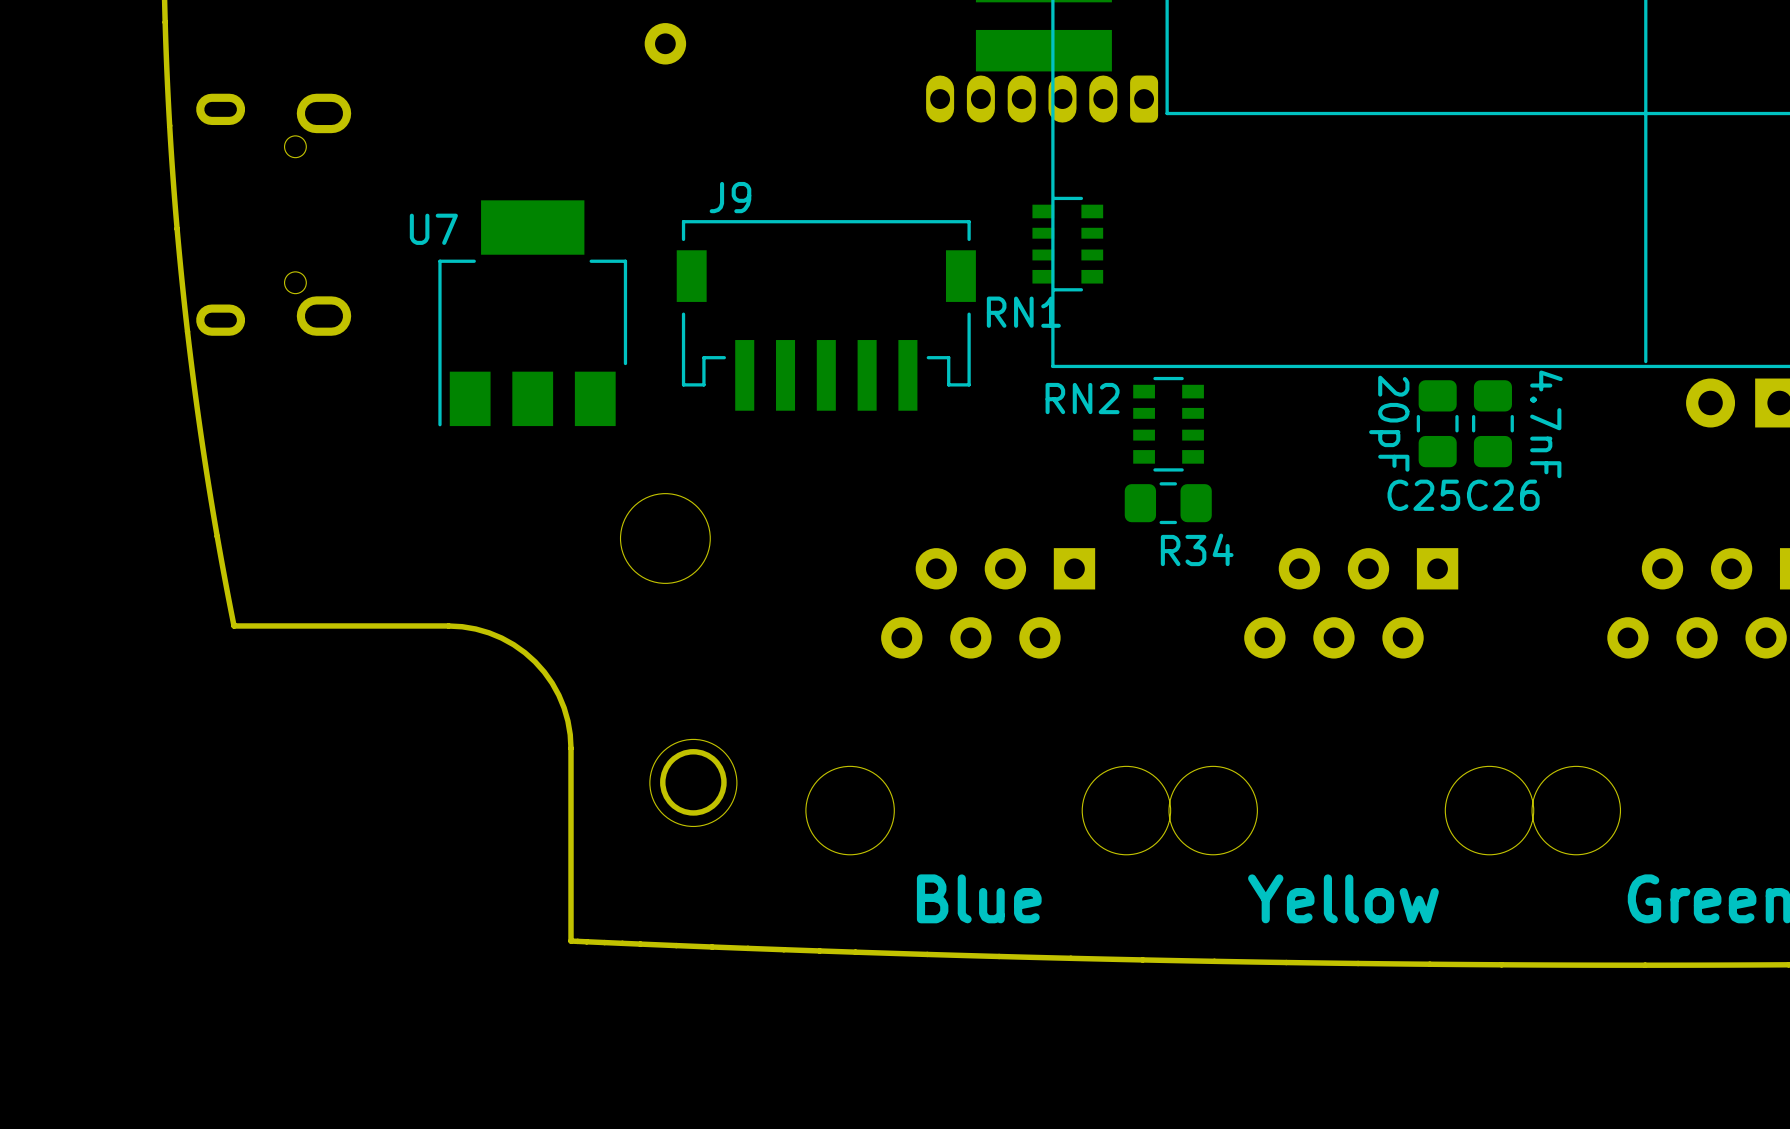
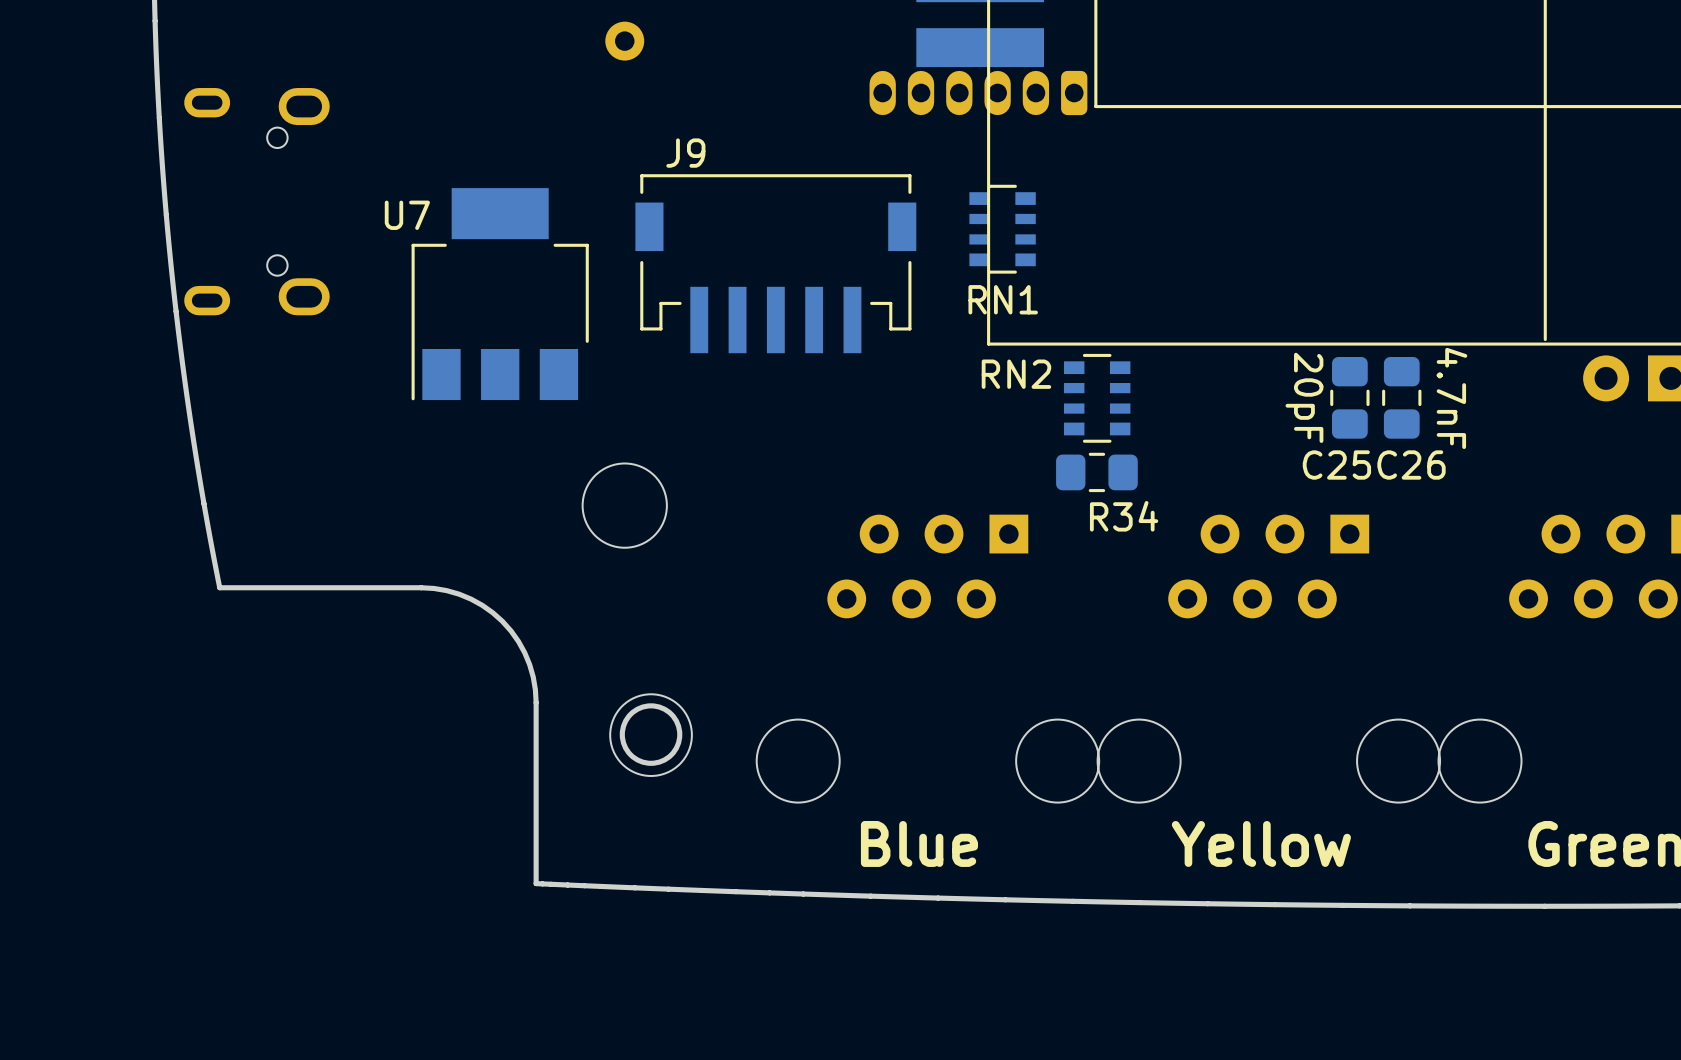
RN1 name position: RN1 (1023, 312) -> RN1 (1003, 299)
J9 position: (826, 315) -> (775, 263)

